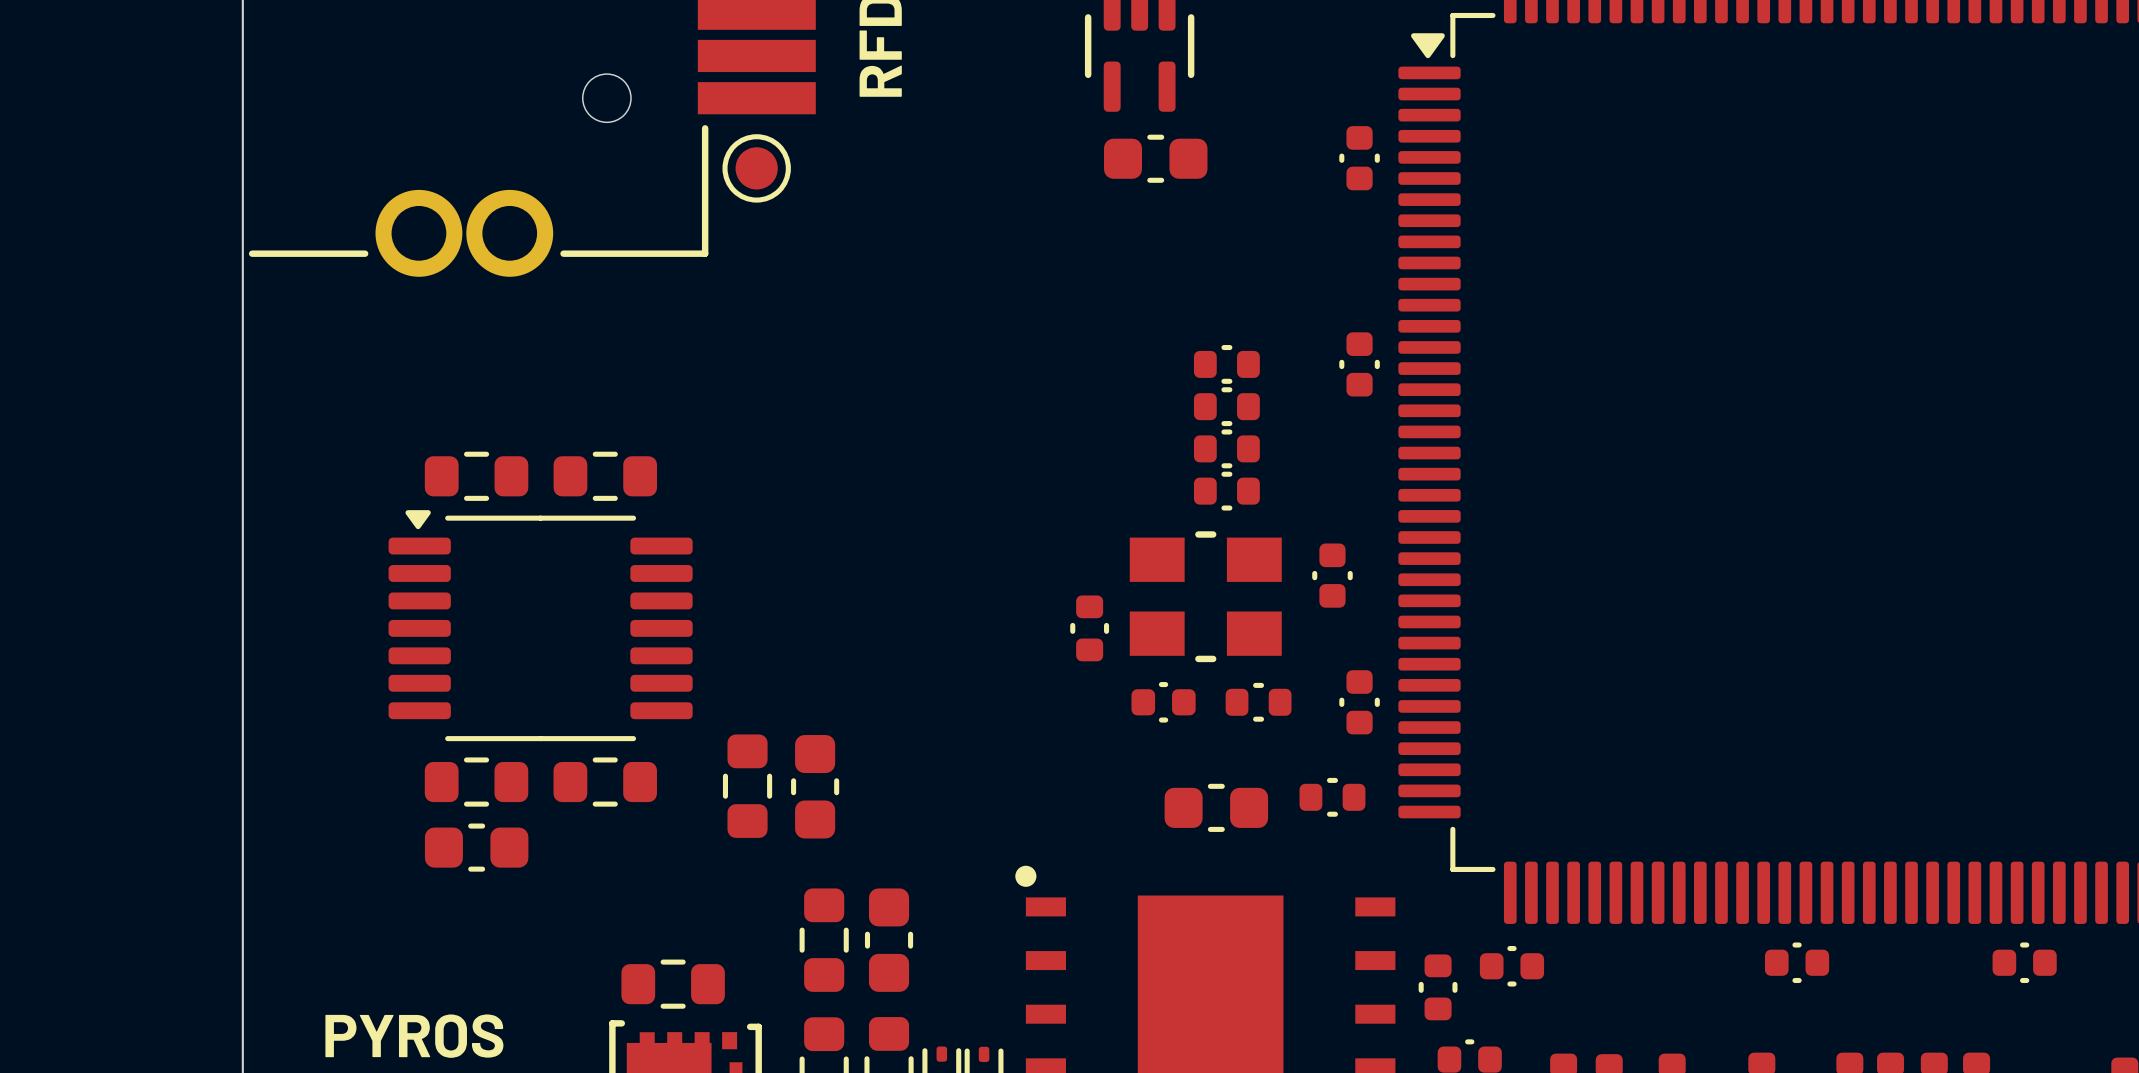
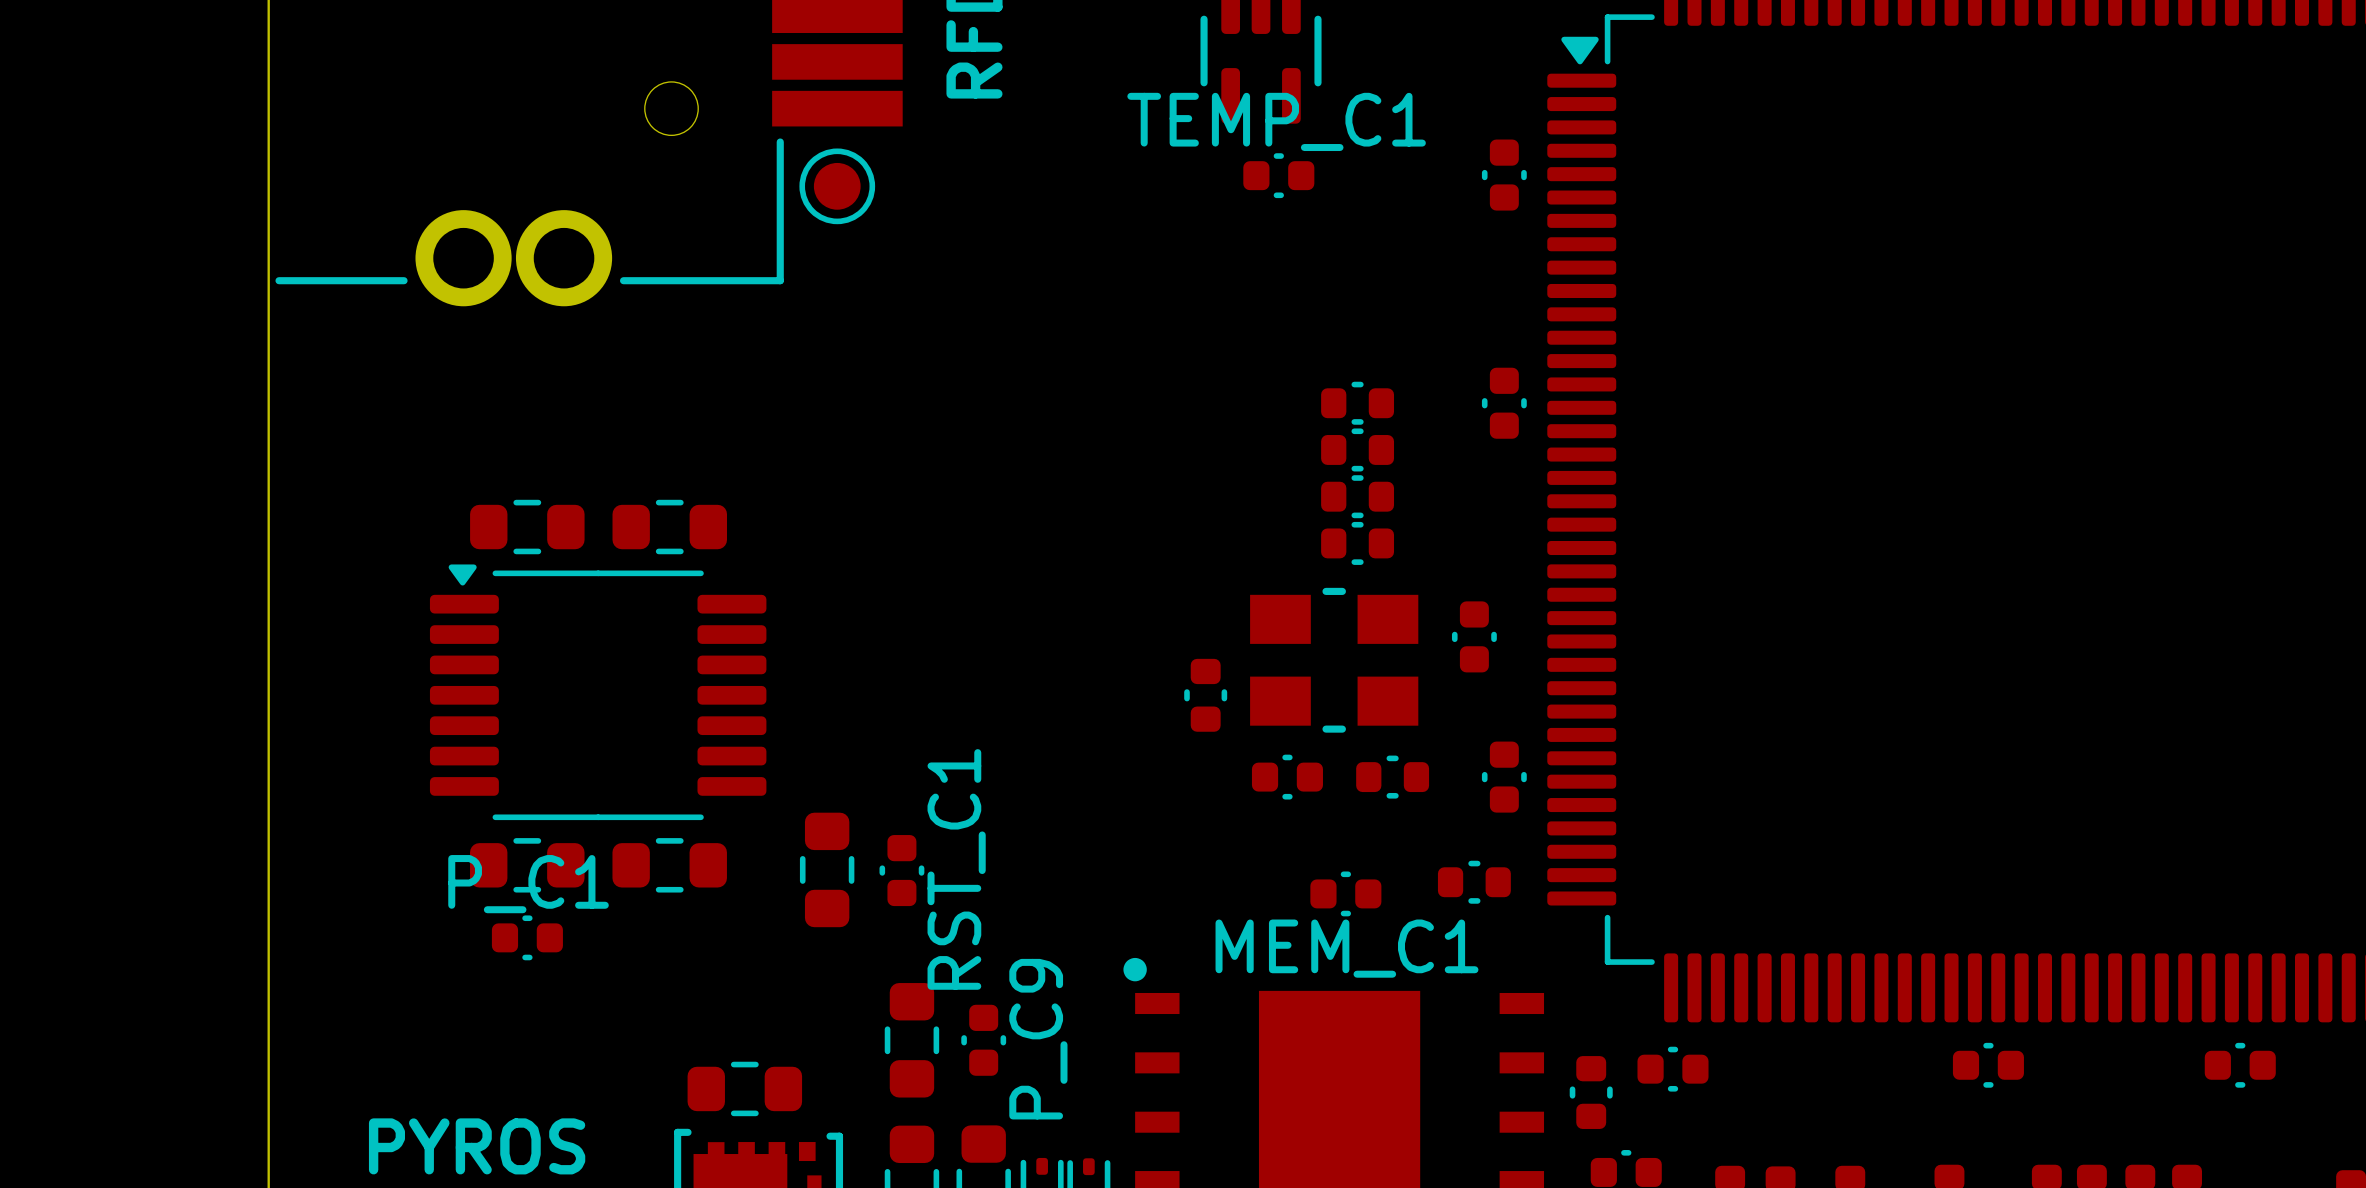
part: (1155, 158) -> none
TEMP_C1: none -> (1278, 175)
part: (815, 786) -> none
RST_C1: none -> (901, 870)
part: (1216, 807) -> none
MEM_C1: none -> (1345, 893)
part: (476, 847) -> none
P_C1: none -> (527, 937)
part: (889, 940) -> none
P_C9: none -> (983, 1040)

